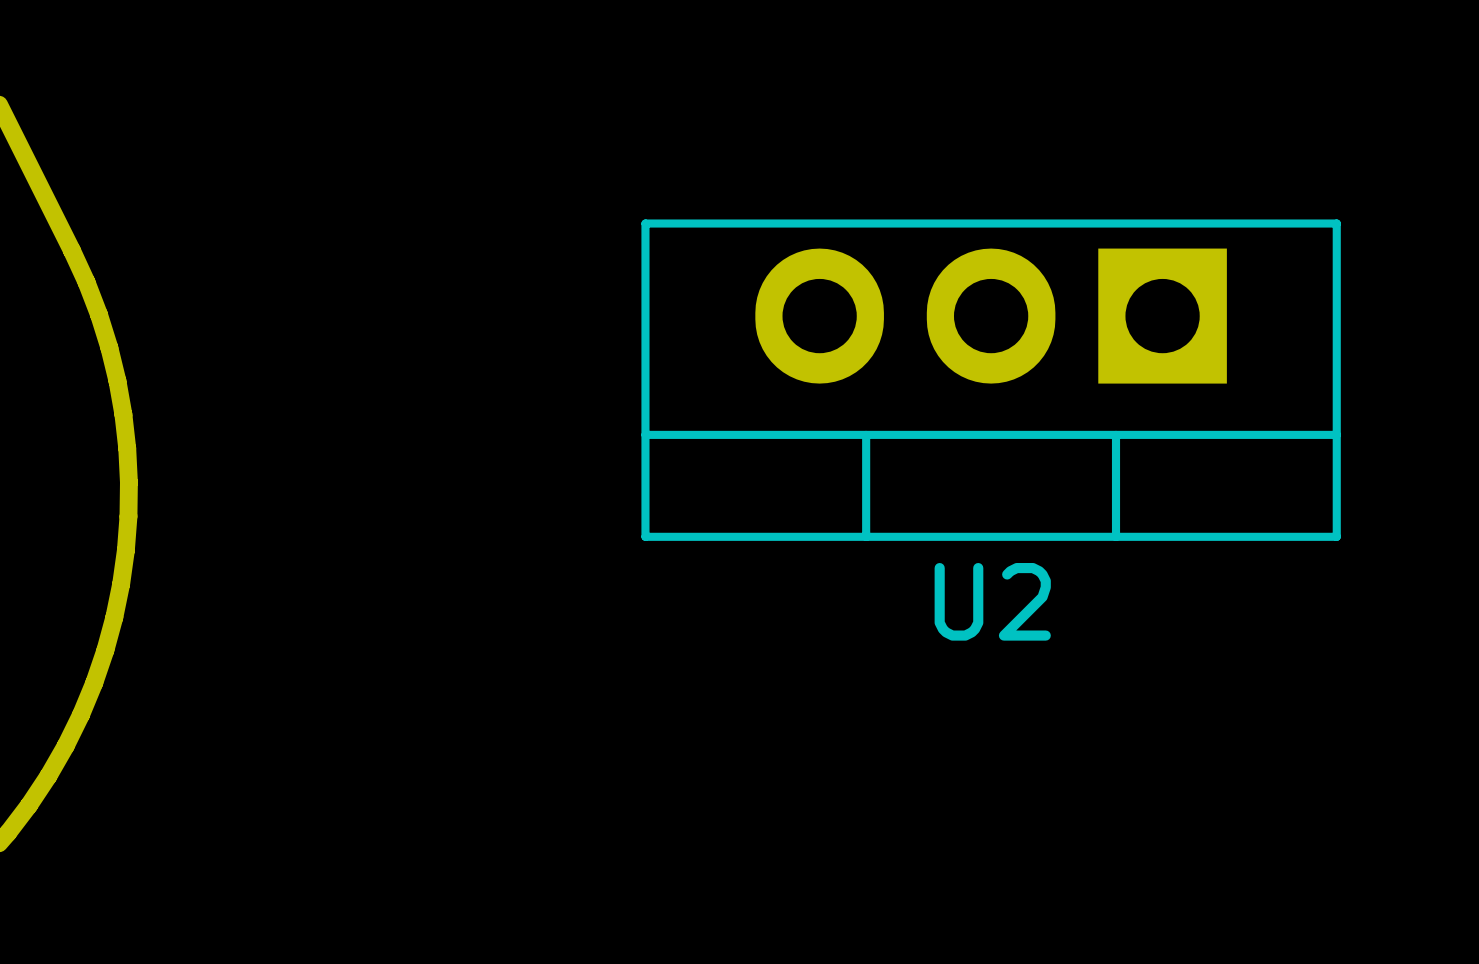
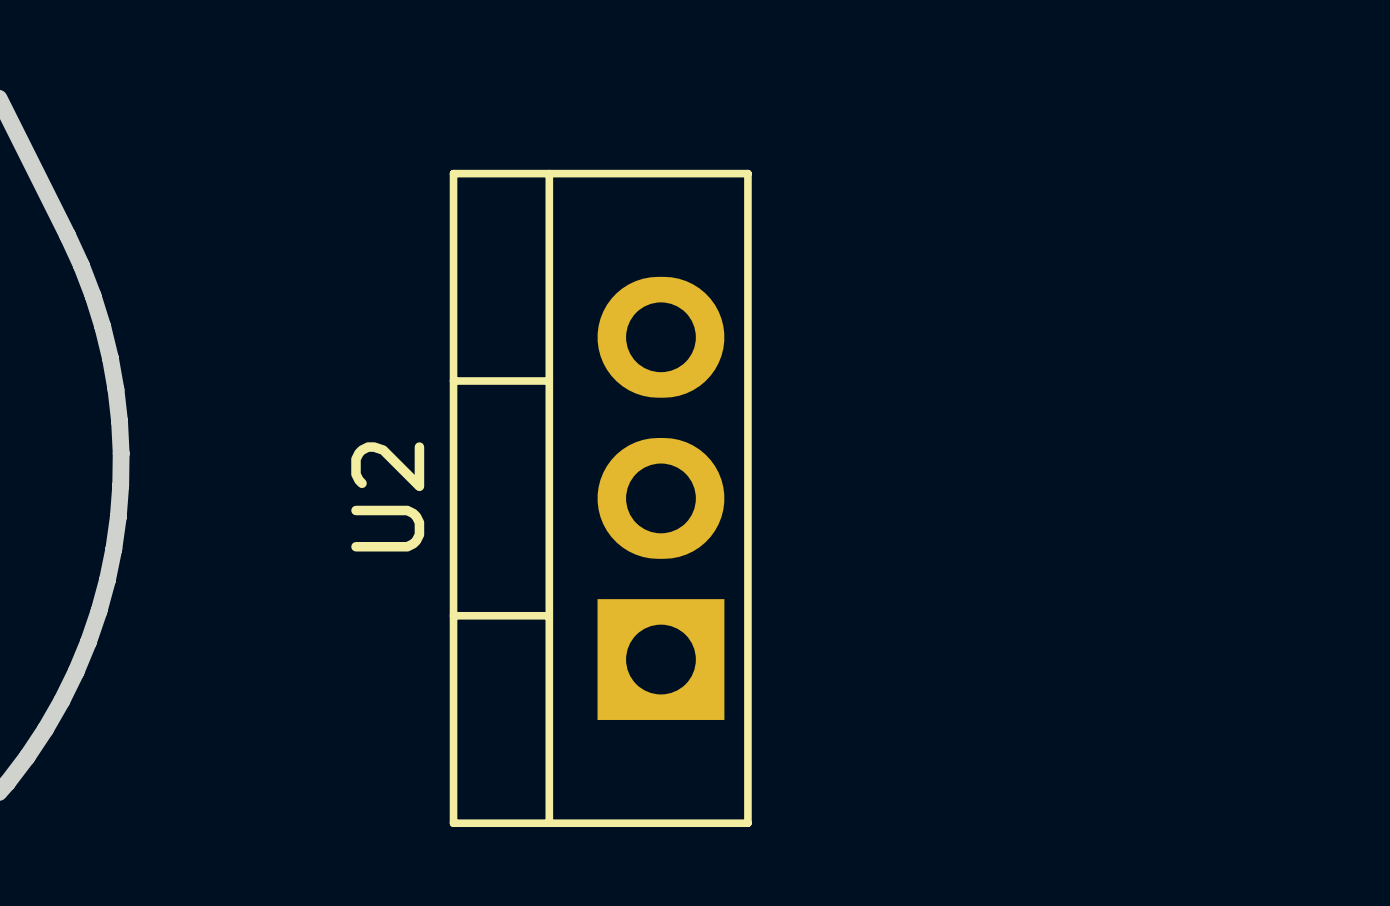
U2 rotation: 0° (991, 380) -> 90° clockwise (600, 498)

